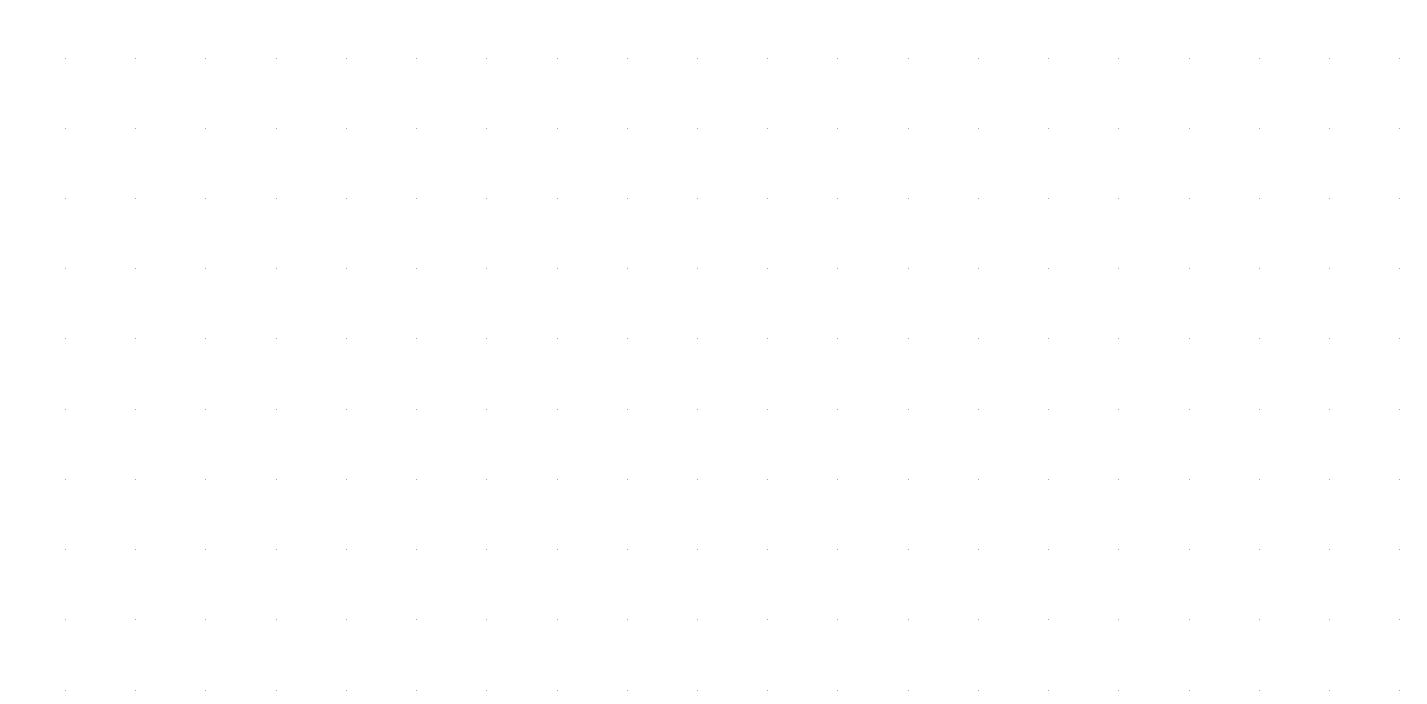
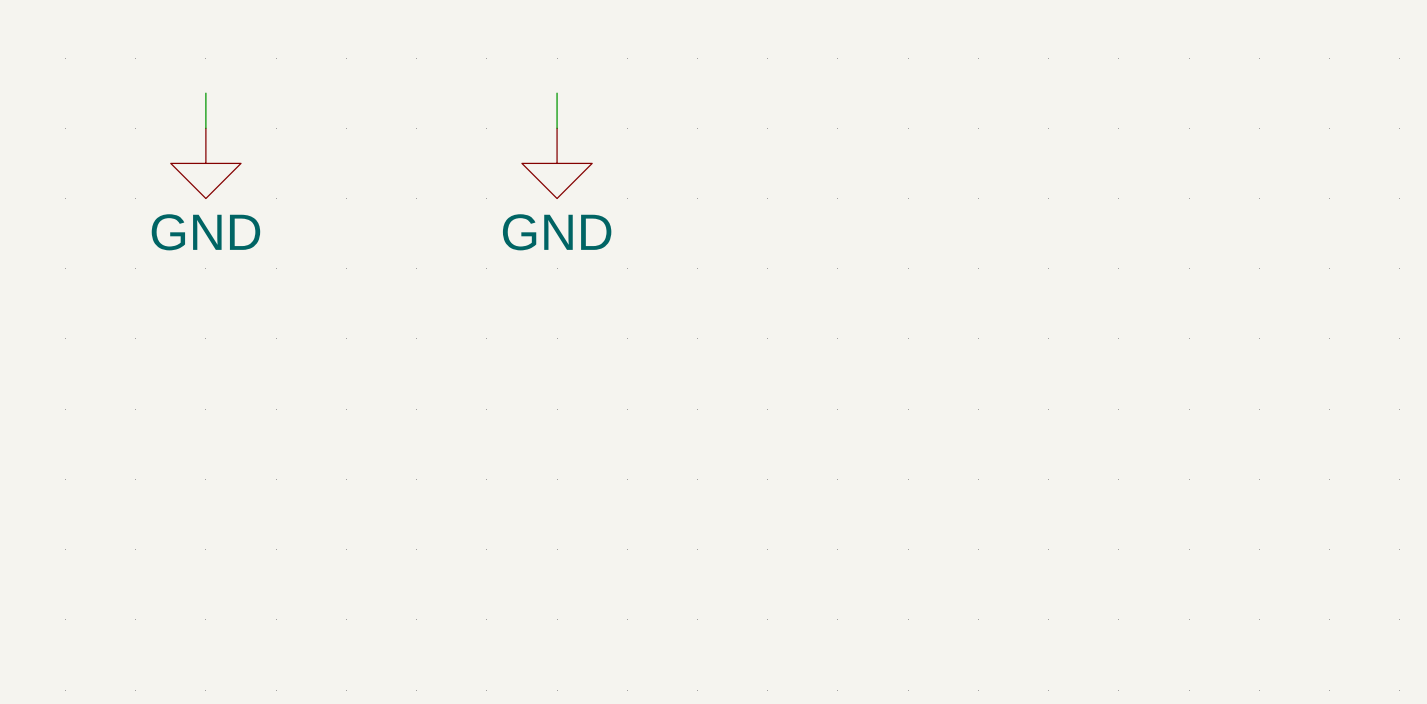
wire: none -> (205, 93) (205, 128)
wire: none -> (557, 93) (557, 128)
power symbol: none -> GND (205, 163)
power symbol: none -> GND (557, 163)

